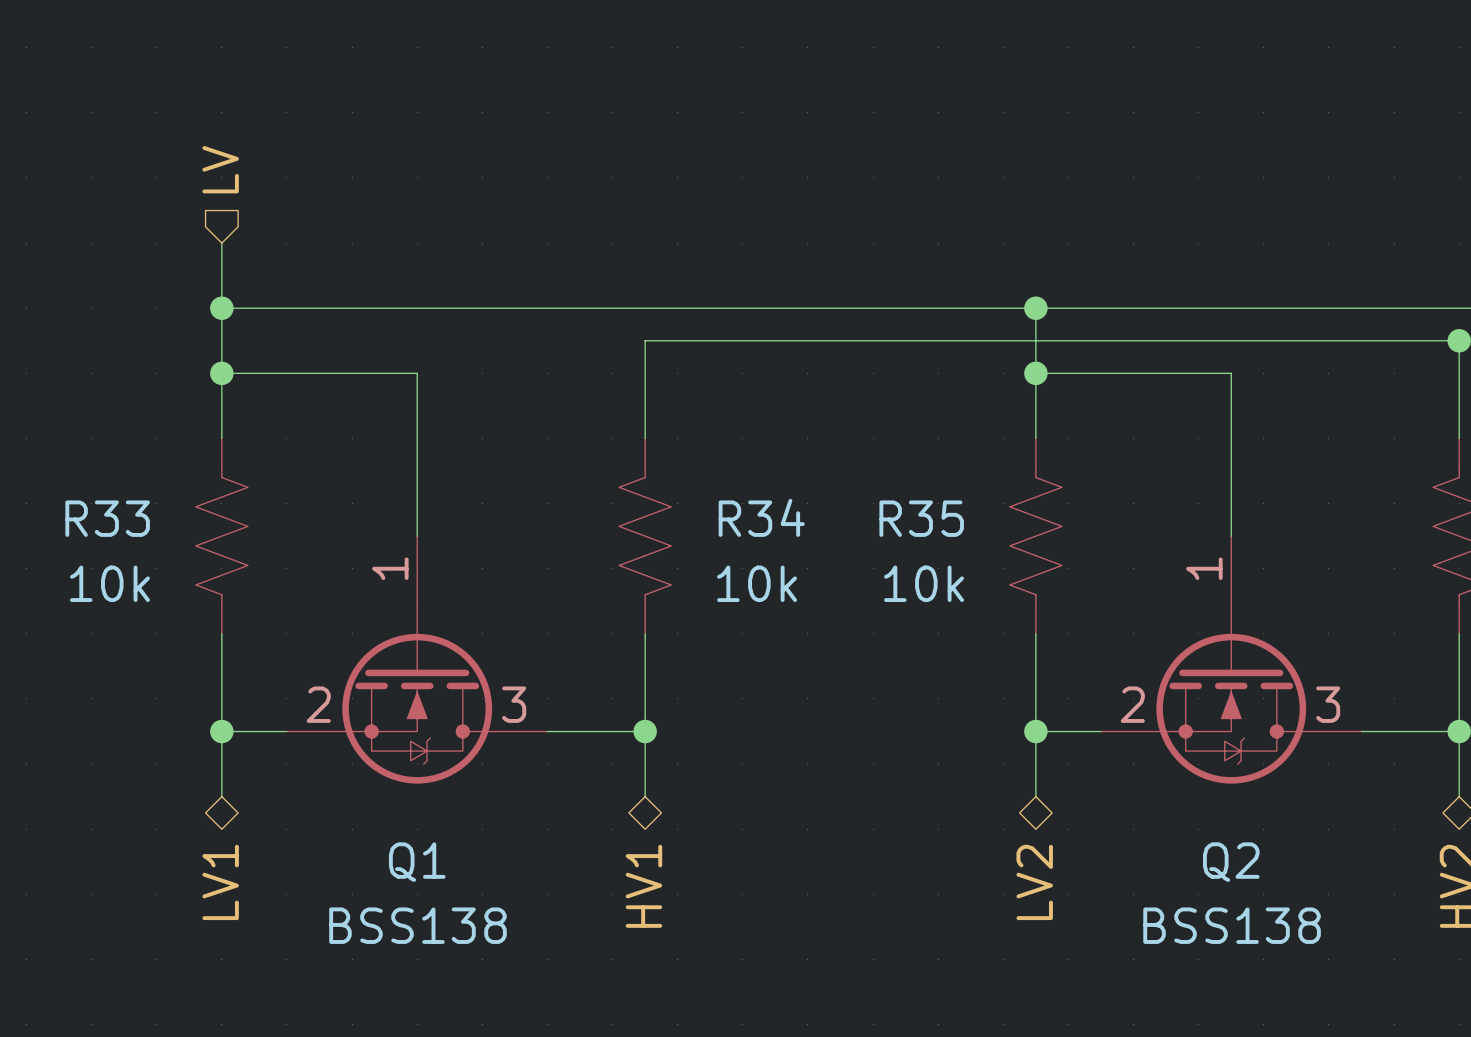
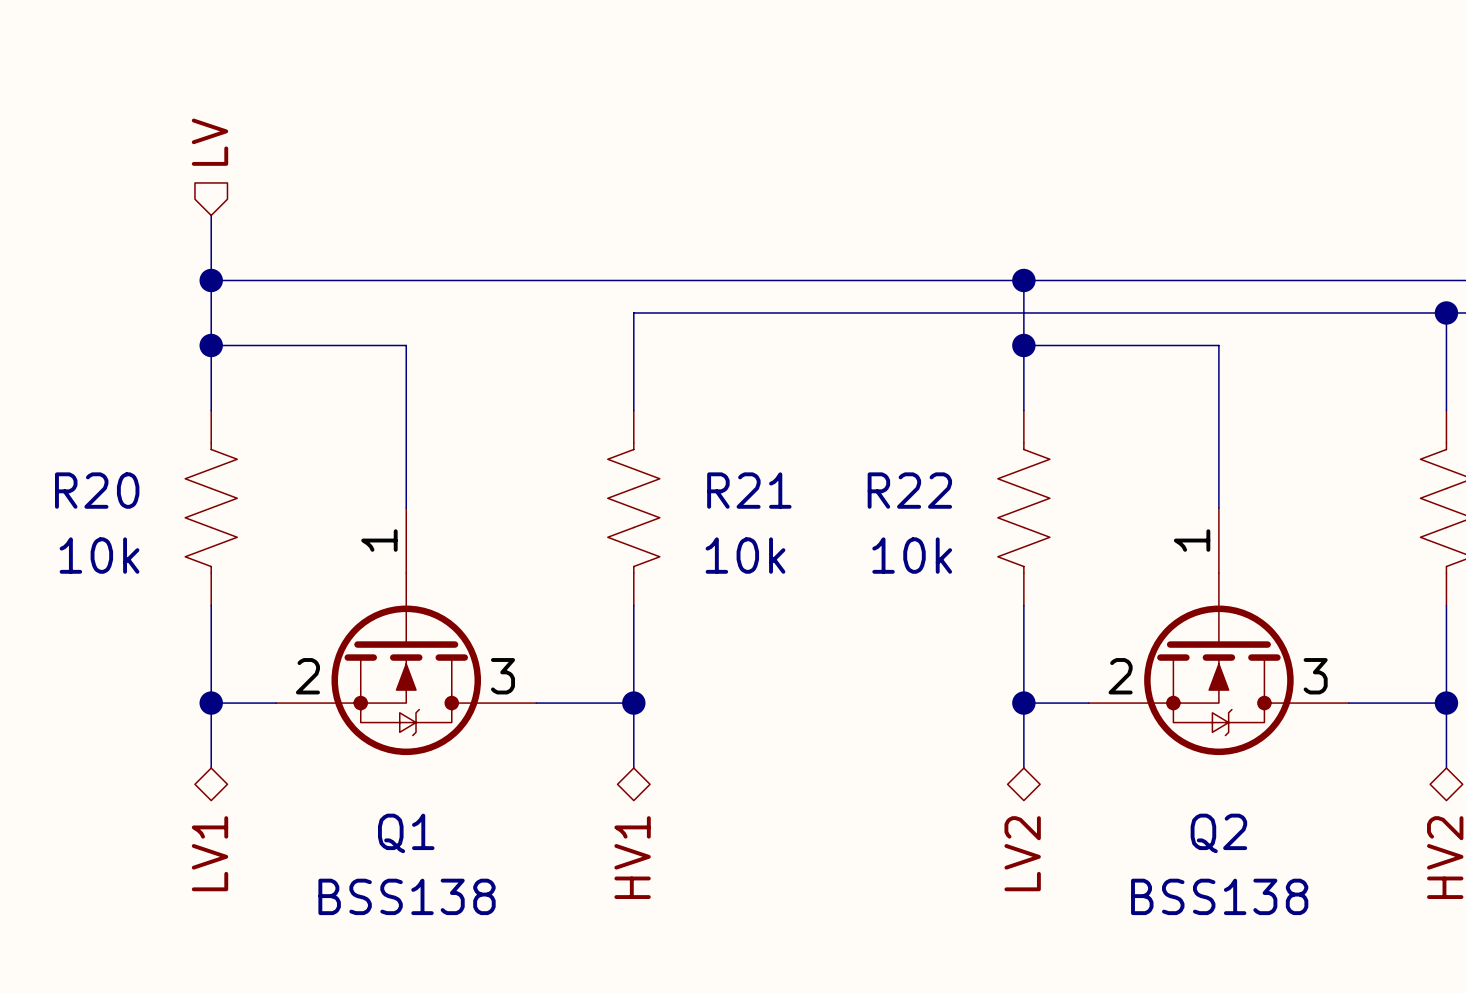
R34 name: R34 (761, 517) -> R21 (749, 490)
R33 name: R33 (107, 518) -> R20 (97, 490)
R35 name: R35 (921, 518) -> R22 (909, 490)

